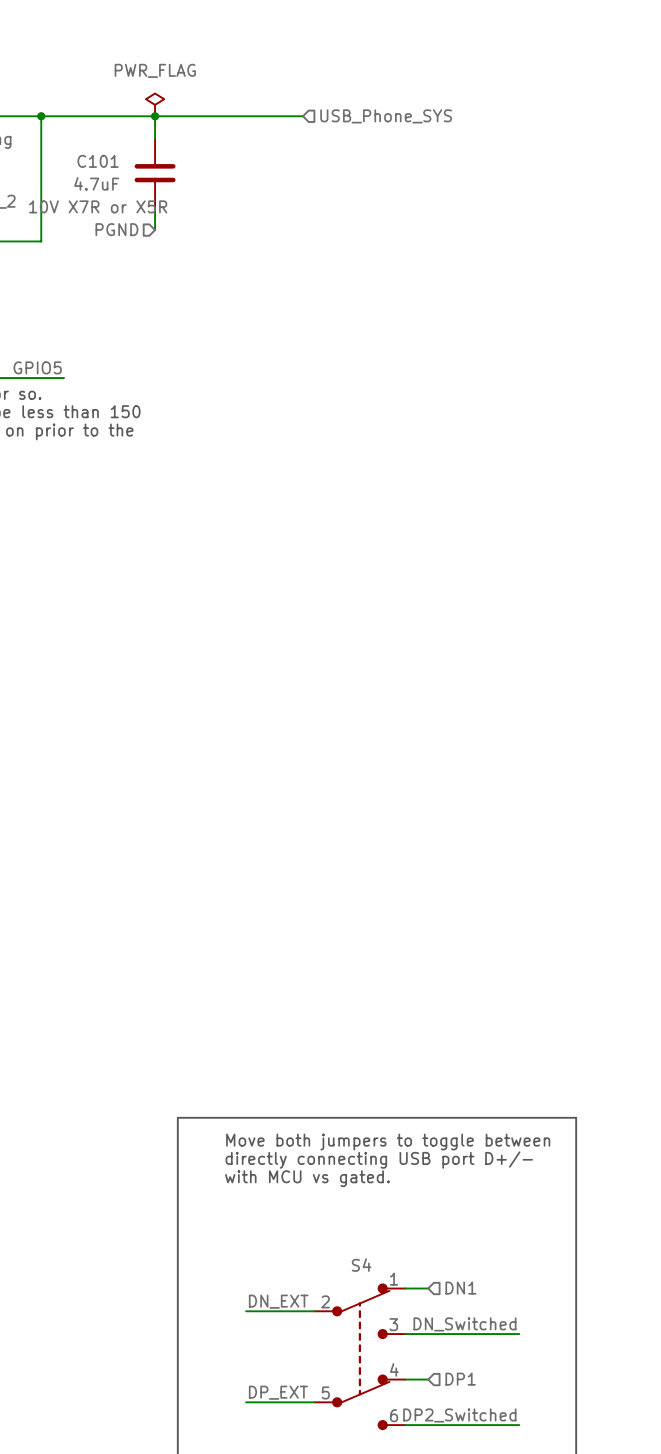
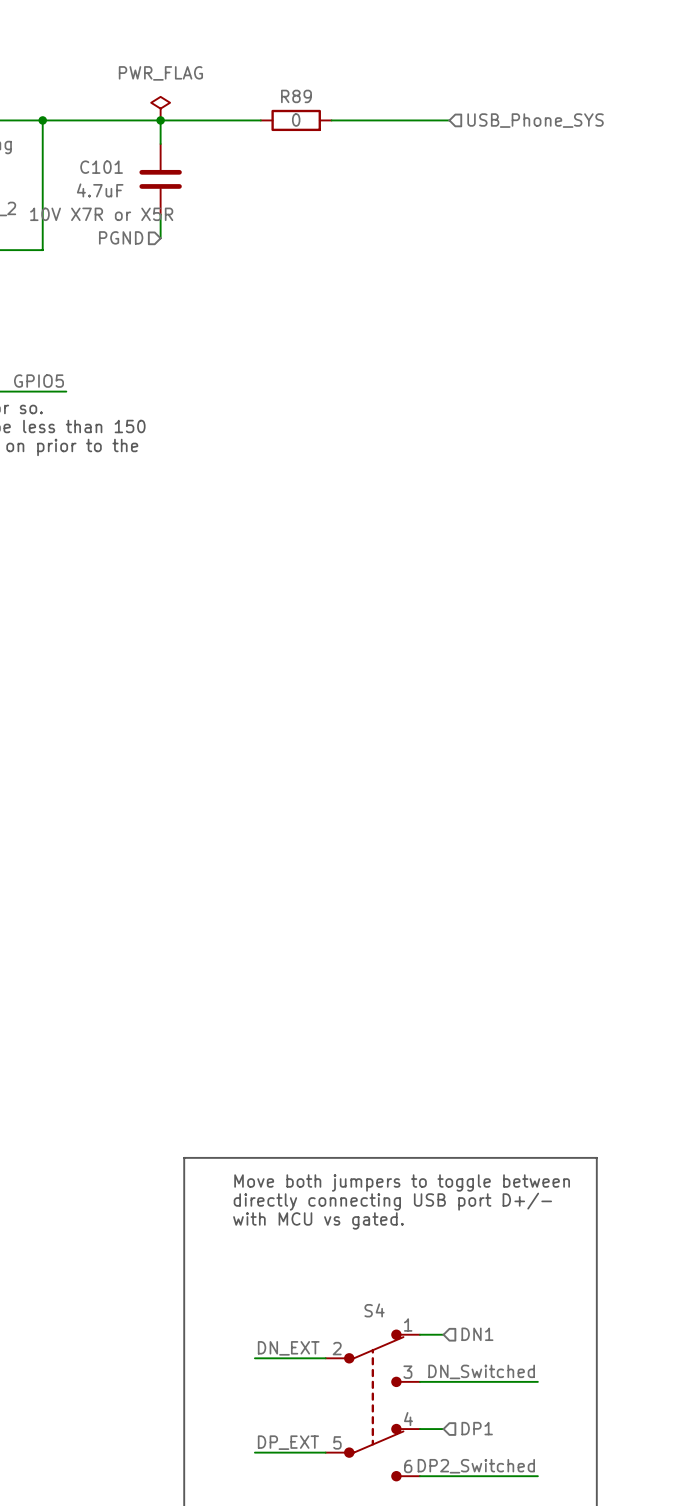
wire: (251, 116) (303, 116) -> none
R89: none -> 0 (296, 120)
wire: none -> (331, 120) (449, 120)
hierarchical label position: USB_Phone_SYS (386, 116) -> USB_Phone_SYS (535, 120)

